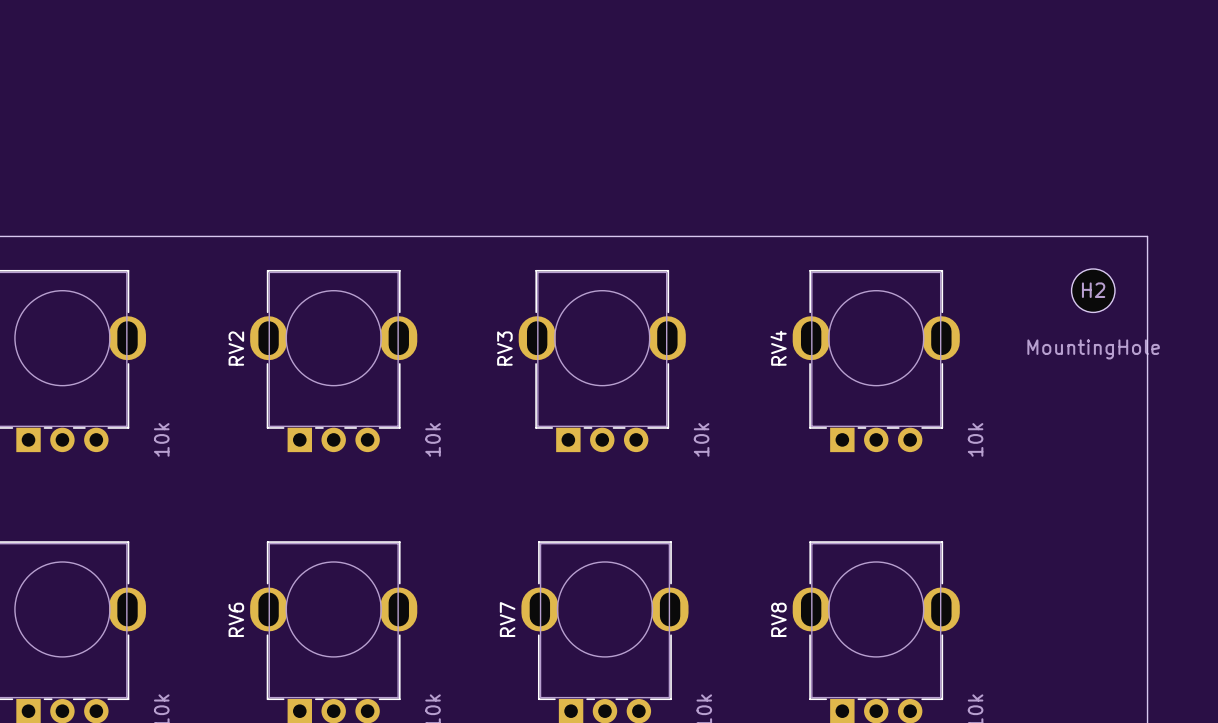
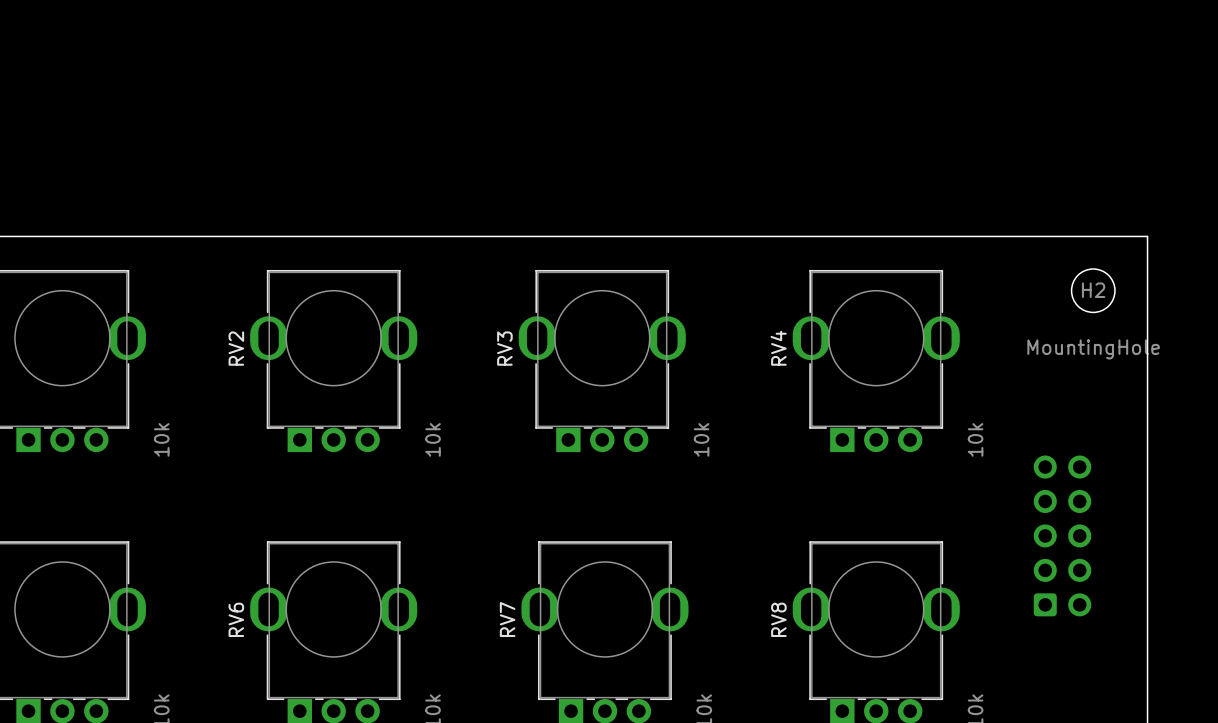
part: none -> (1062, 535)

